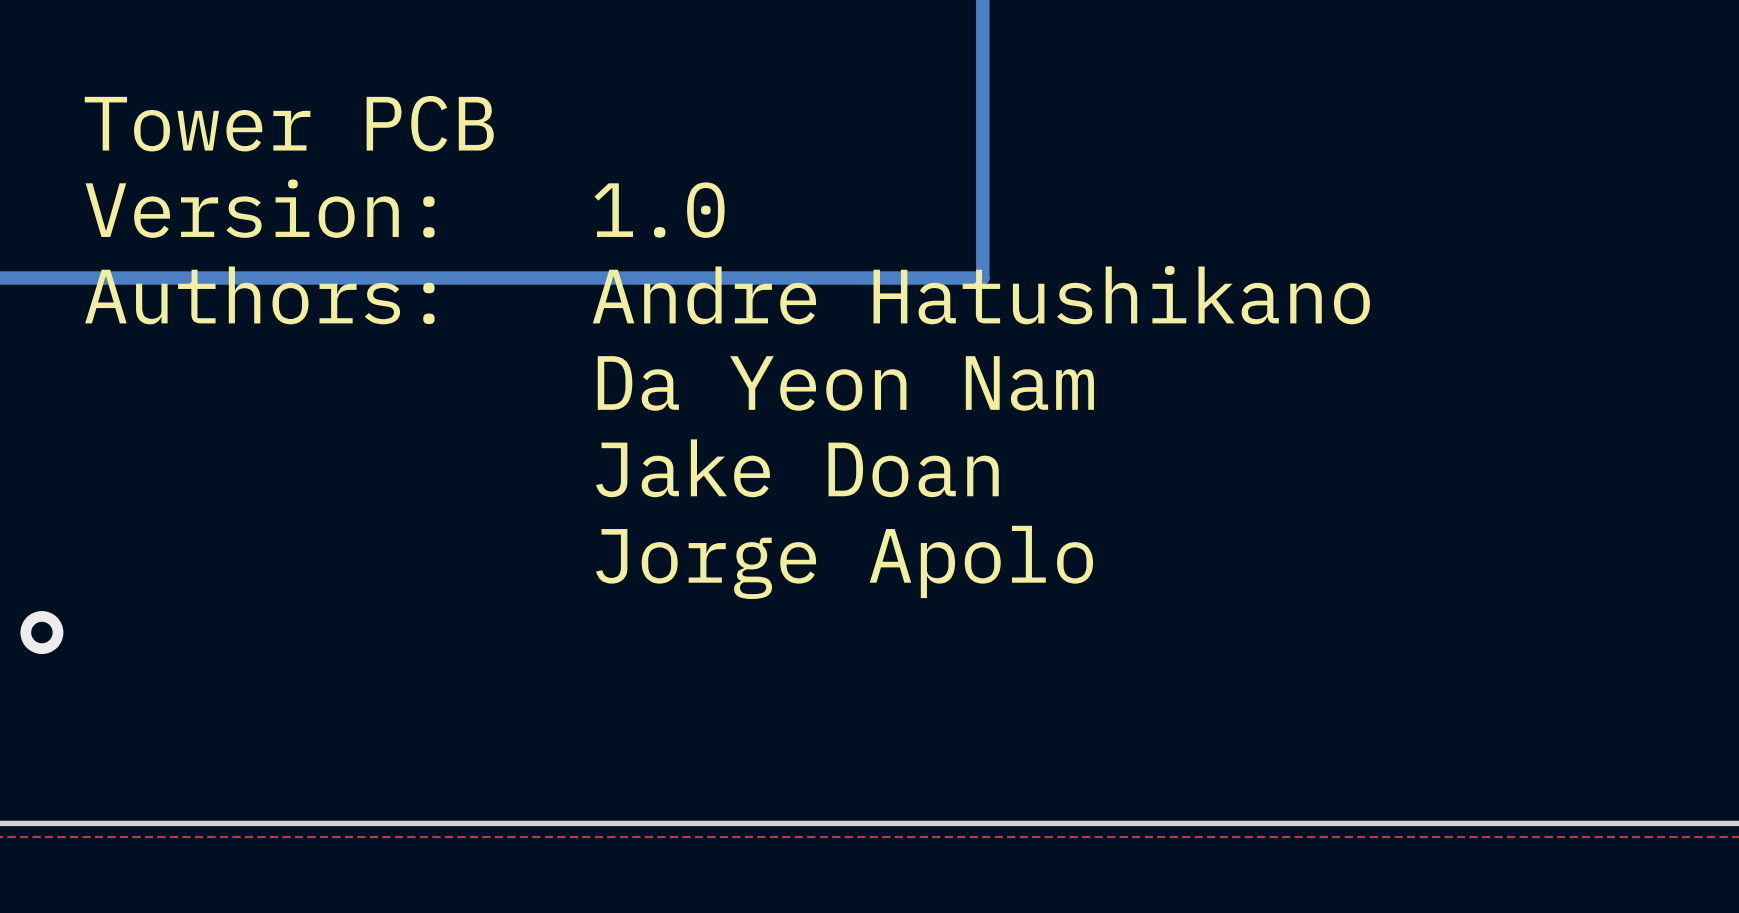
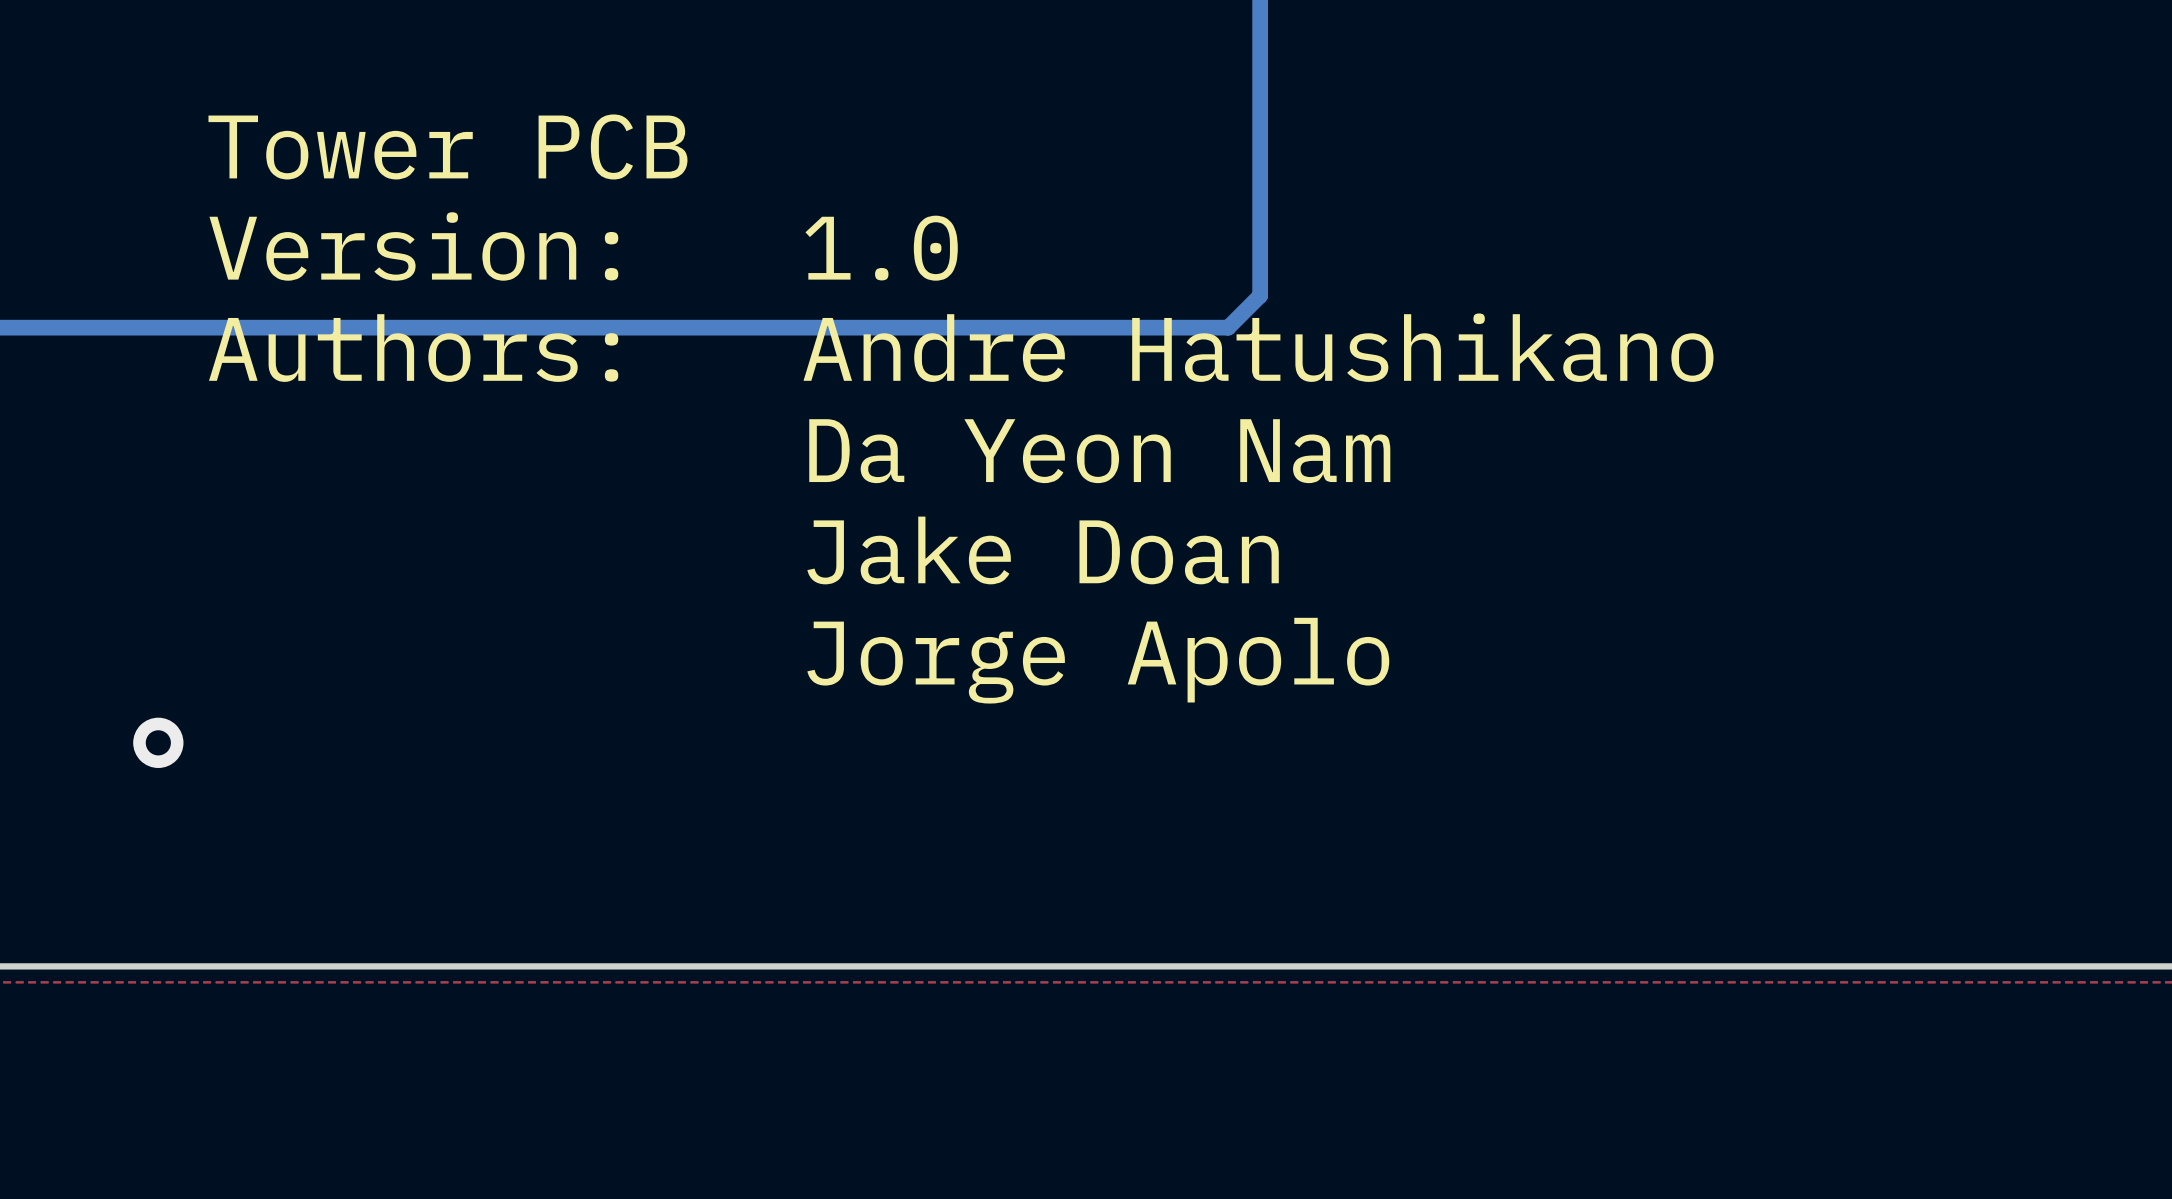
bottom track: (982, 250) (982, 278) (955, 278) -> (1260, 295) (1228, 327)

